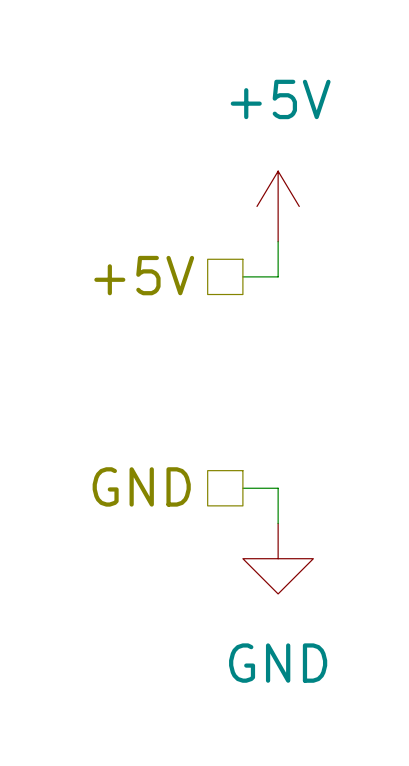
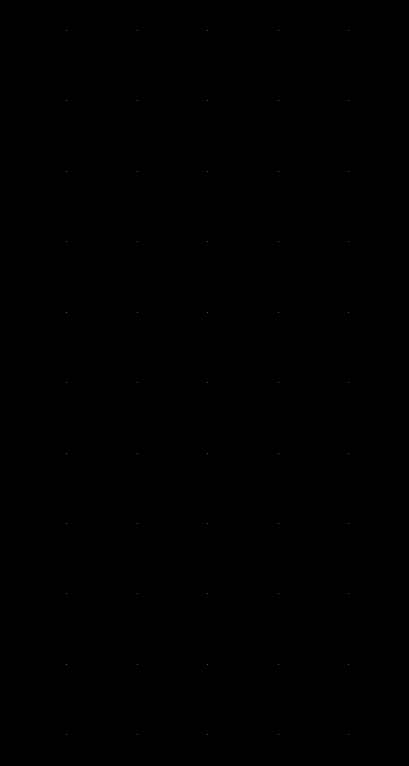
power symbol: +5V (278, 206) -> none
wire: (278, 241) (278, 276) (242, 276) -> none
hierarchical label: +5V (144, 275) -> none
hierarchical label: GND (141, 486) -> none
wire: (242, 488) (278, 488) (278, 523) -> none
power symbol: GND (278, 558) -> none

